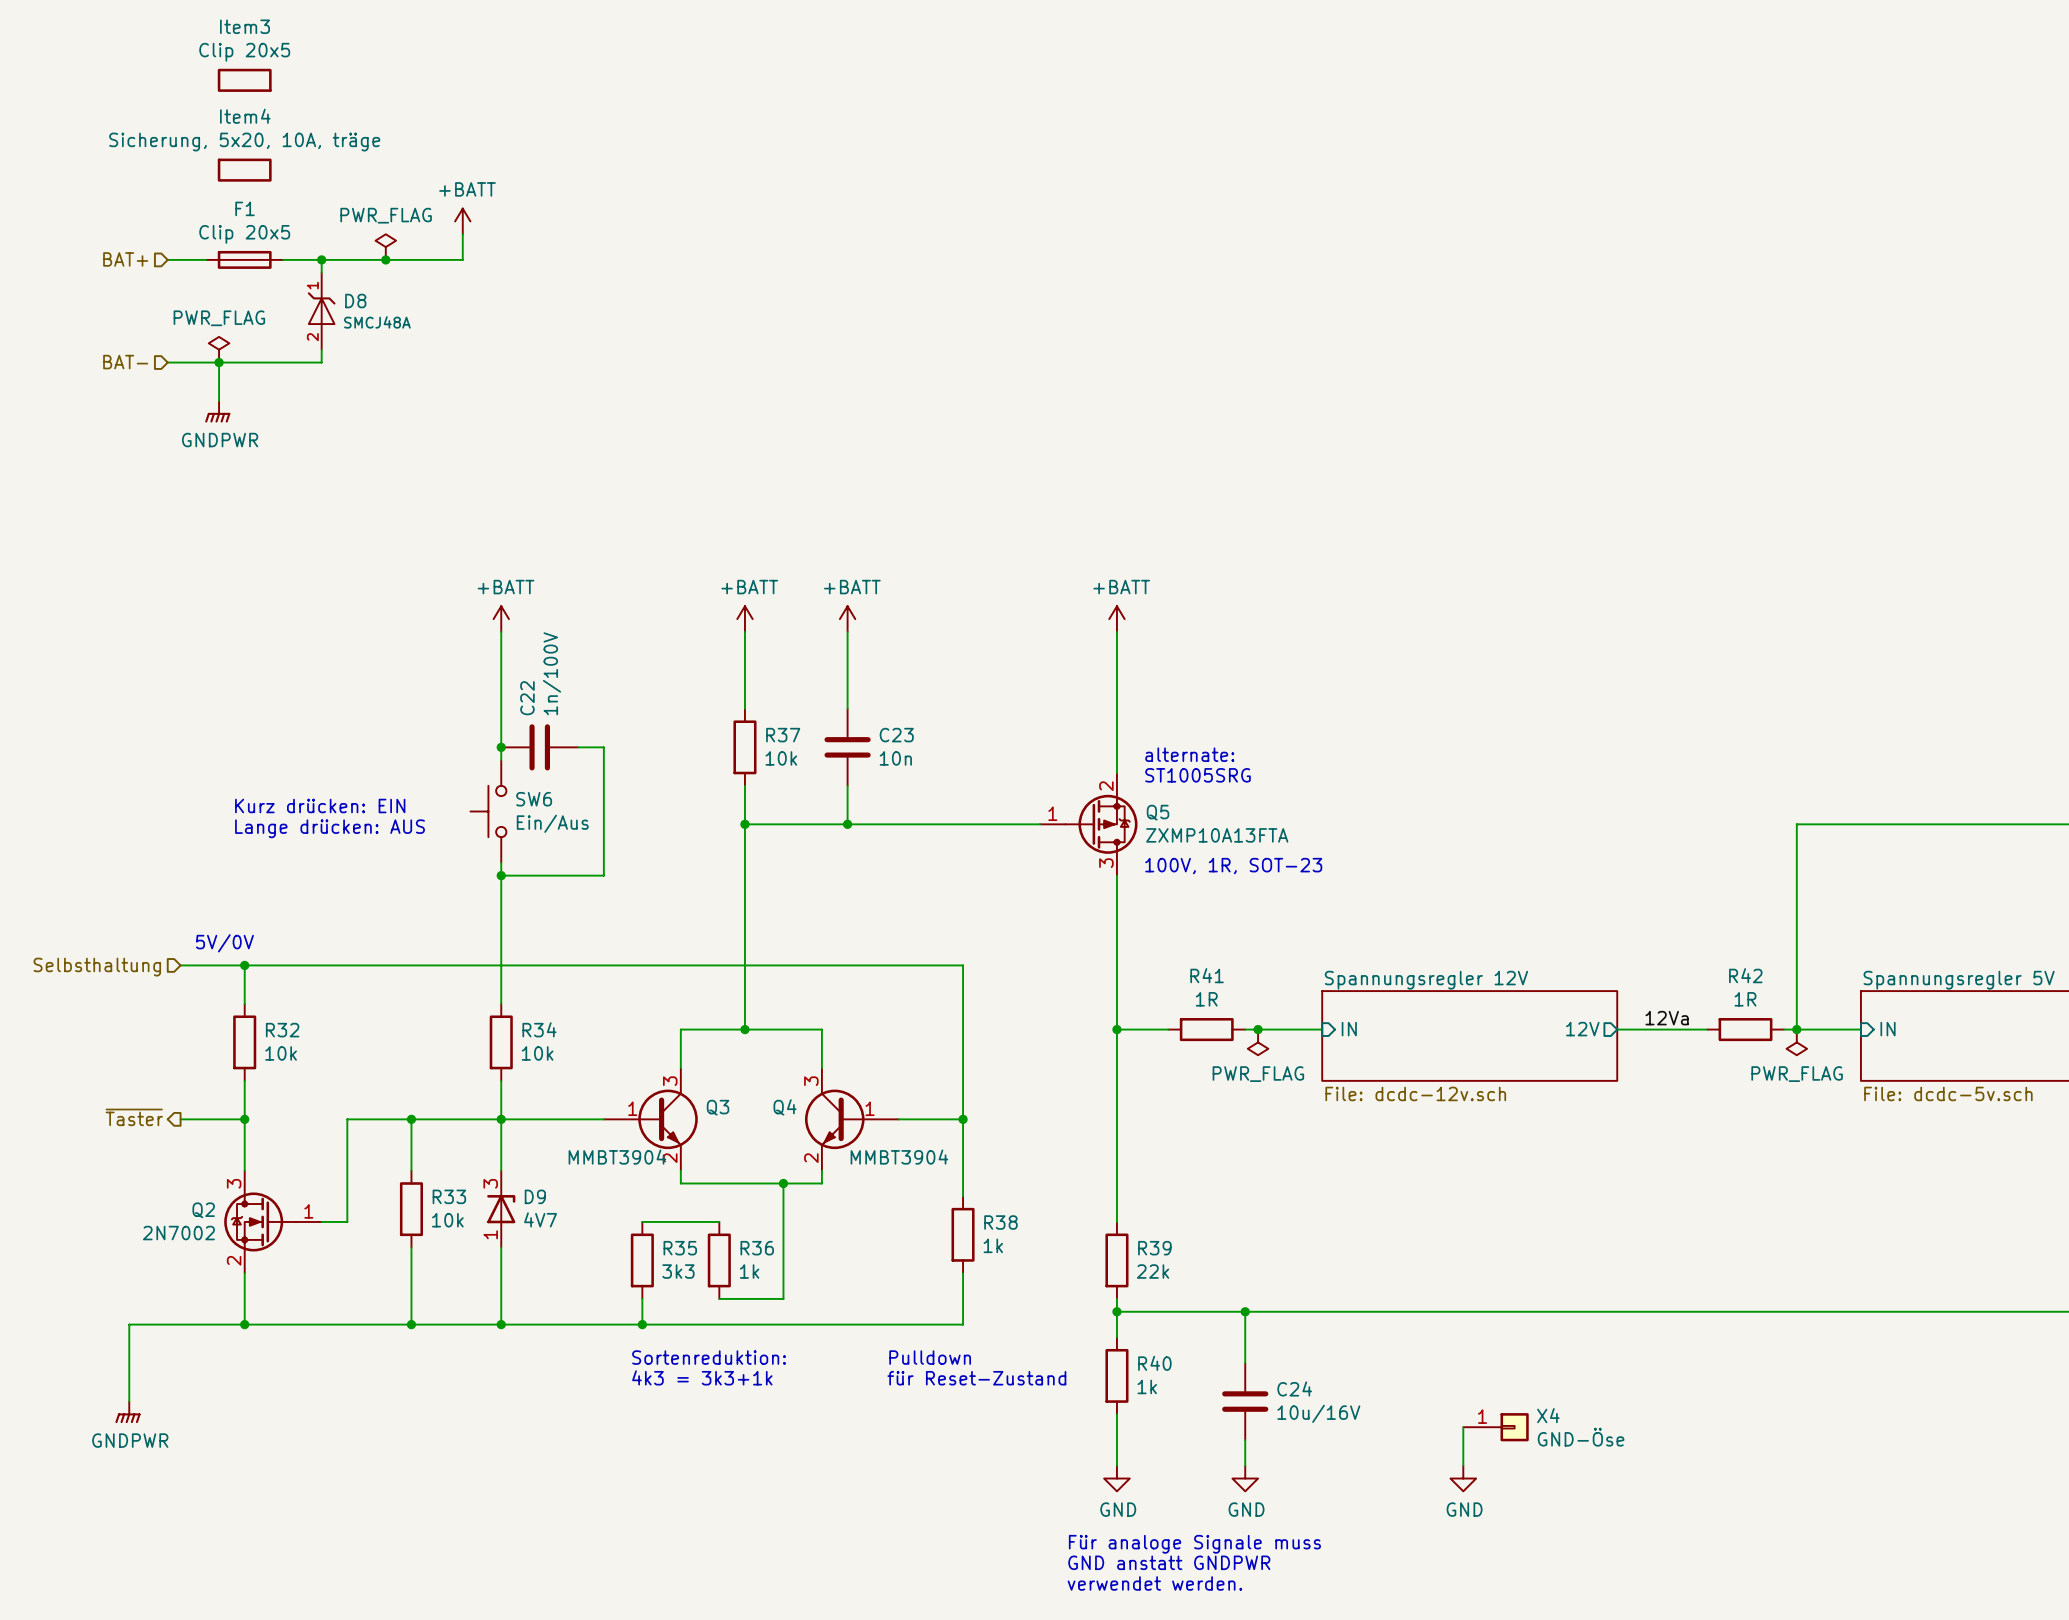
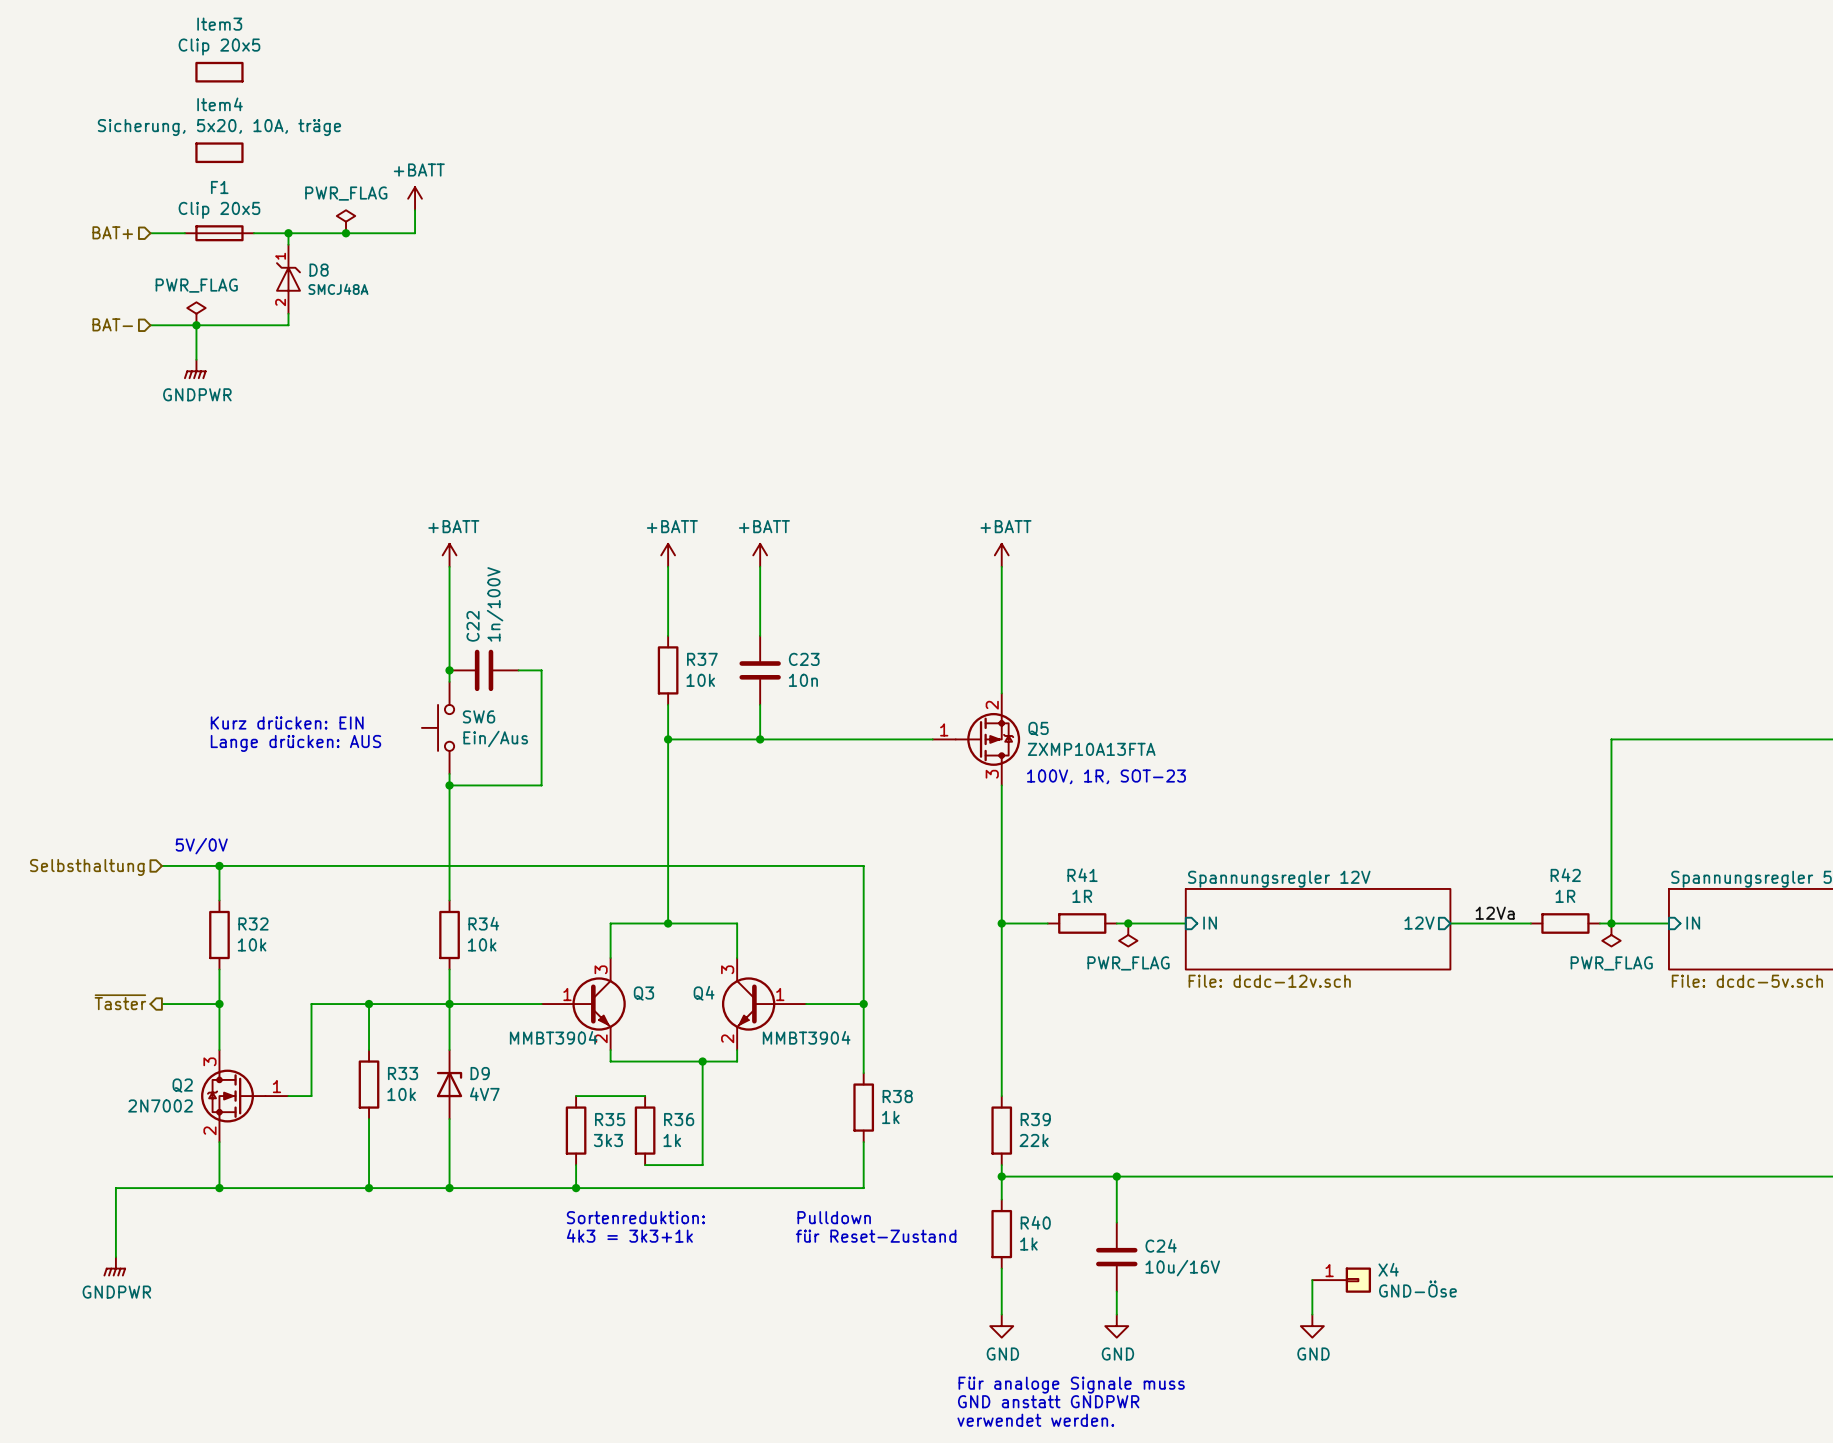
text: alternate: (1189, 754) -> none
text: ST1005SRG (1198, 775) -> none
D9 pin number: 3 (490, 1183) -> none
D9 pin number: 1 (490, 1234) -> none

